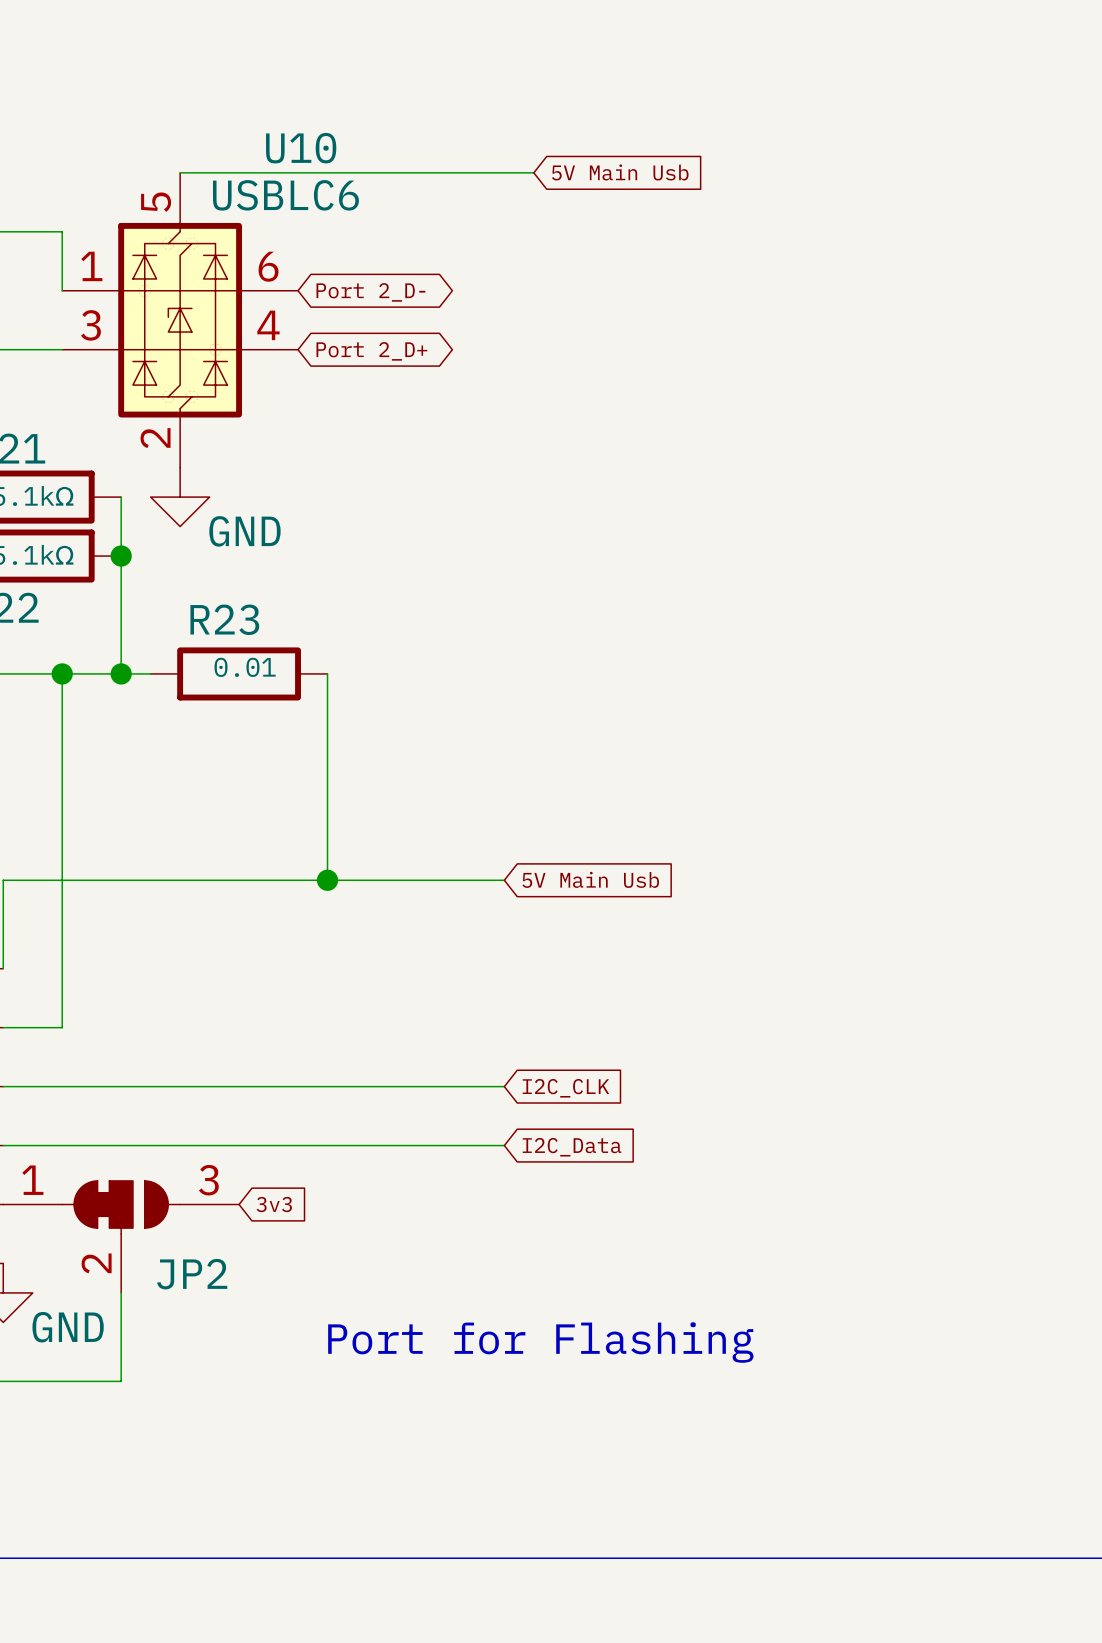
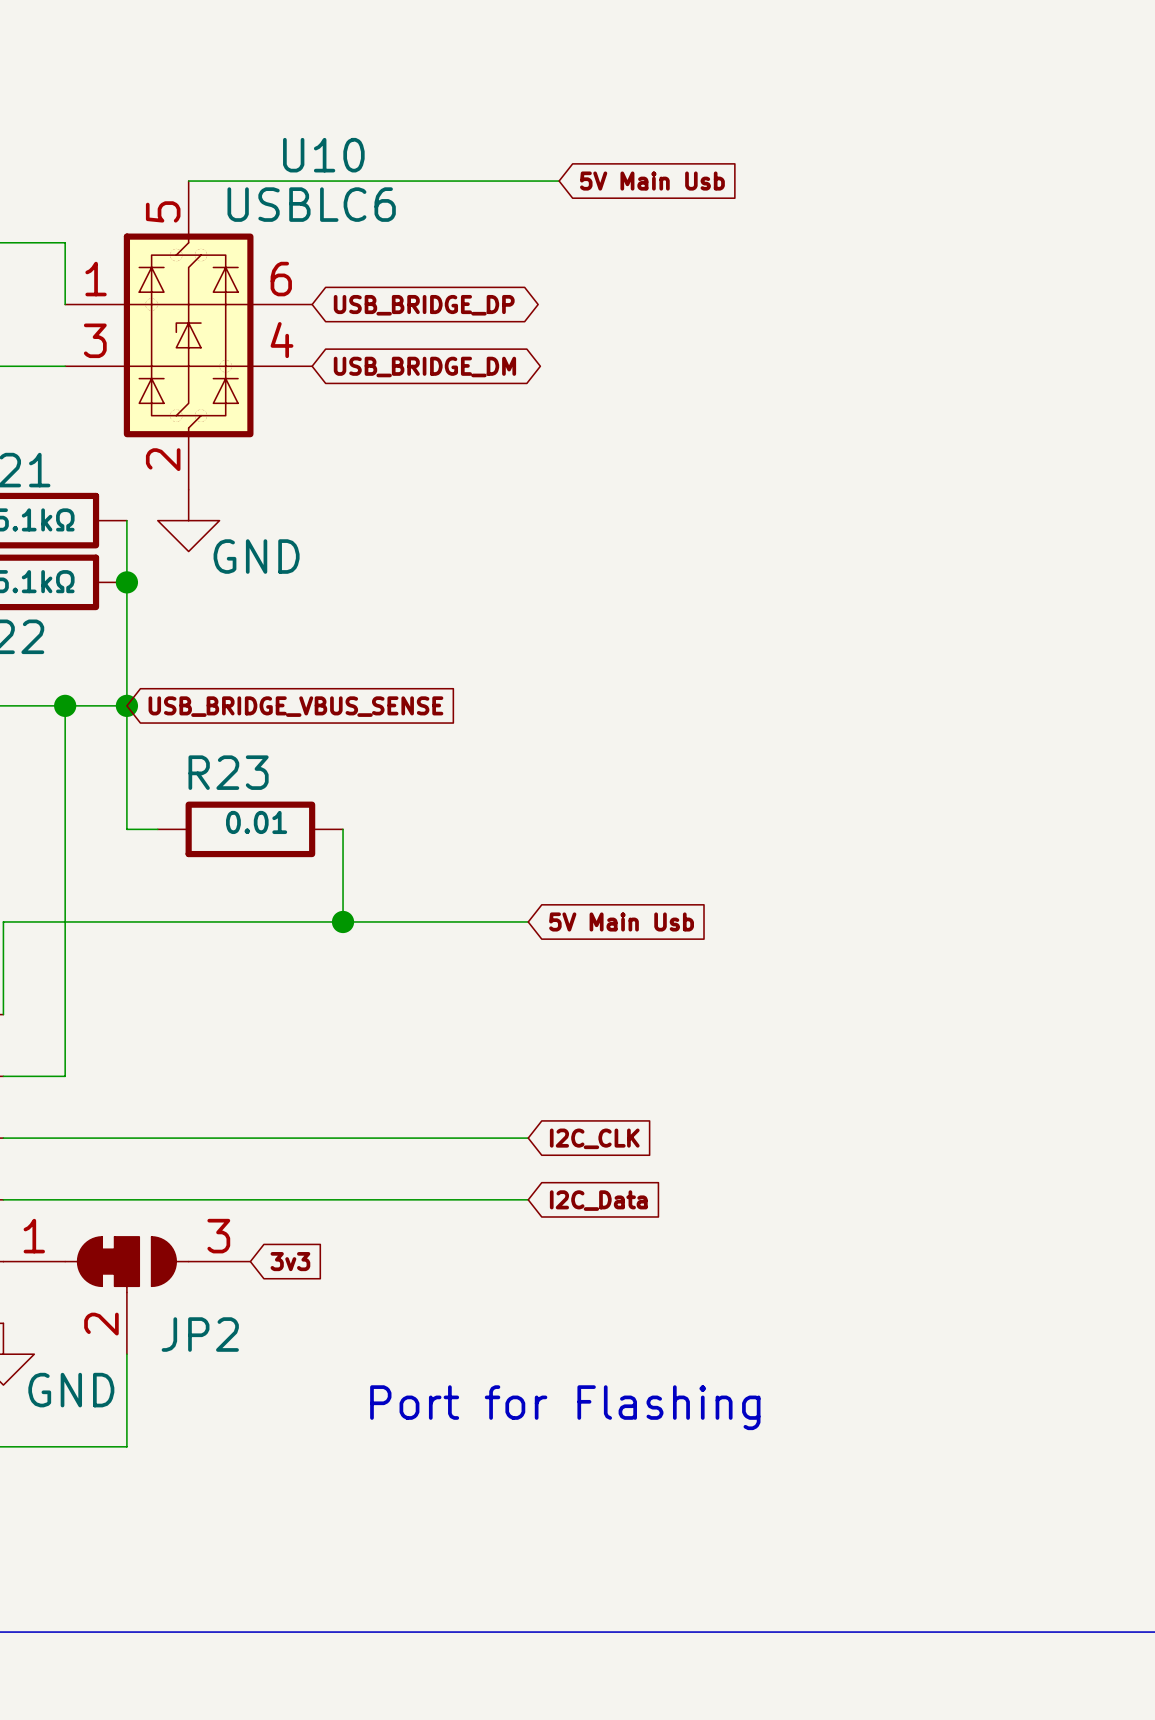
global label: Port 2_D- (370, 292) -> USB_BRIDGE_DP (424, 305)
global label: Port 2_D+ (371, 351) -> USB_BRIDGE_DM (424, 367)
wire: (121, 673) (150, 673) -> (126, 705) (126, 829) (157, 829)
R23 position: (239, 673) -> (250, 829)
wire: (327, 673) (327, 791) -> none
global label: none -> USB_BRIDGE_VBUS_SENSE (295, 706)

